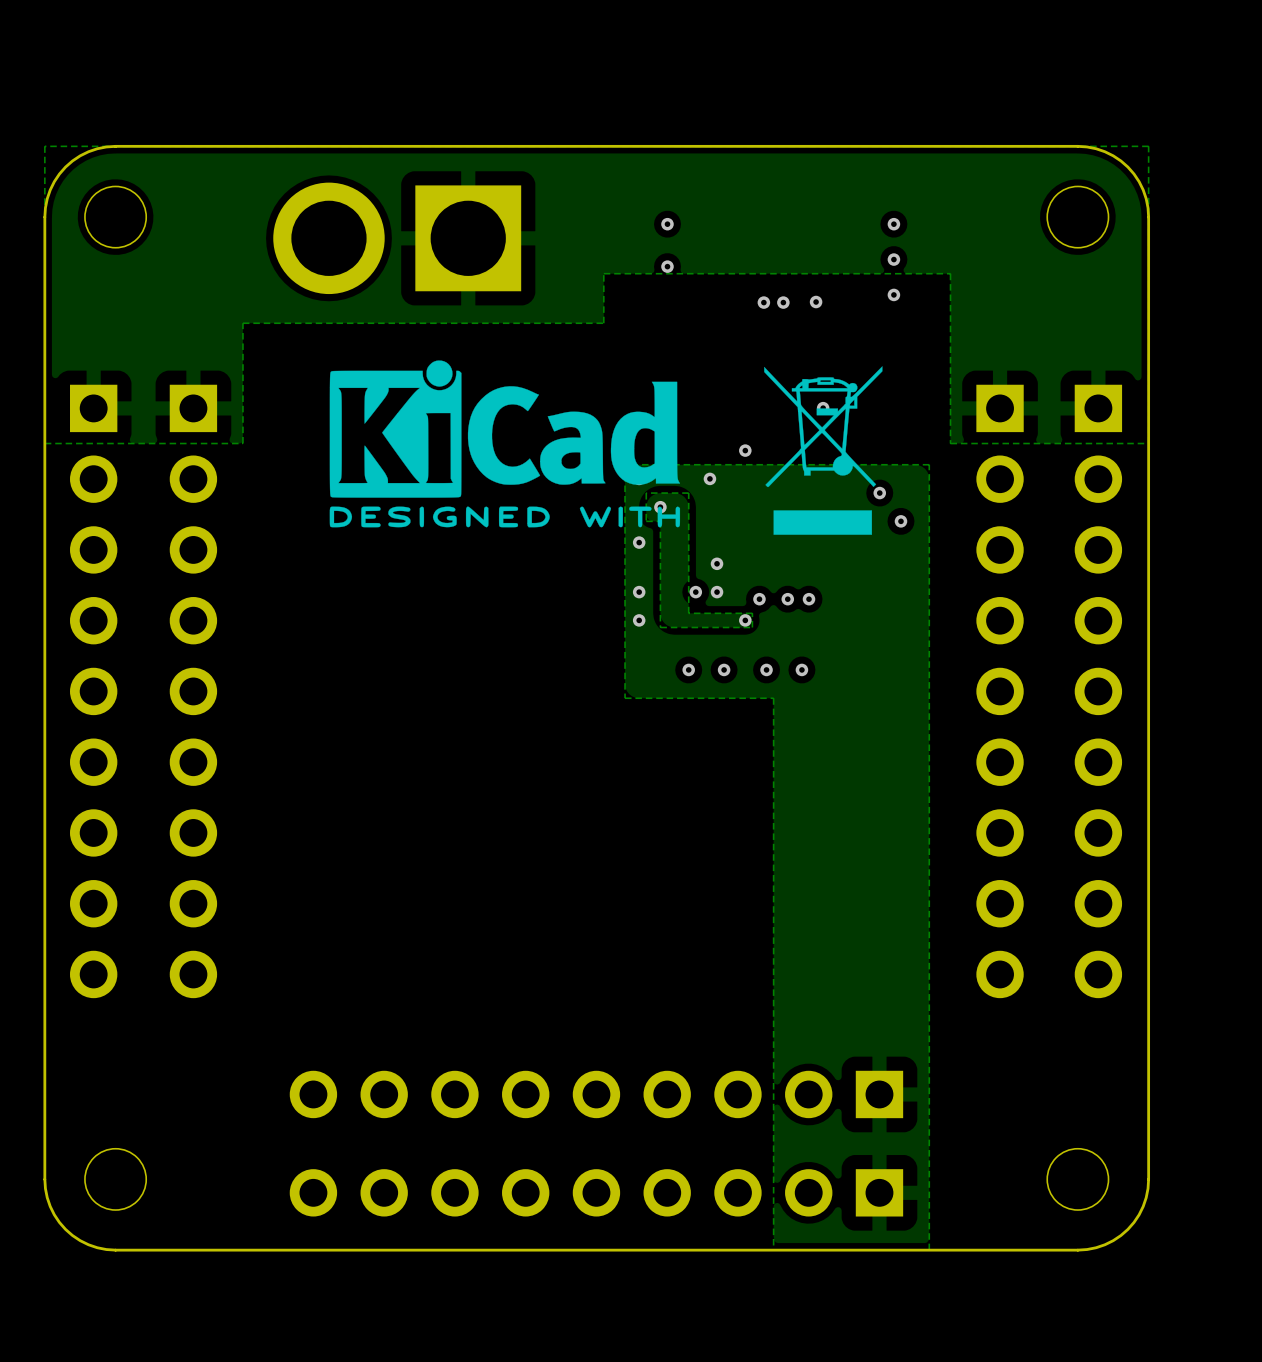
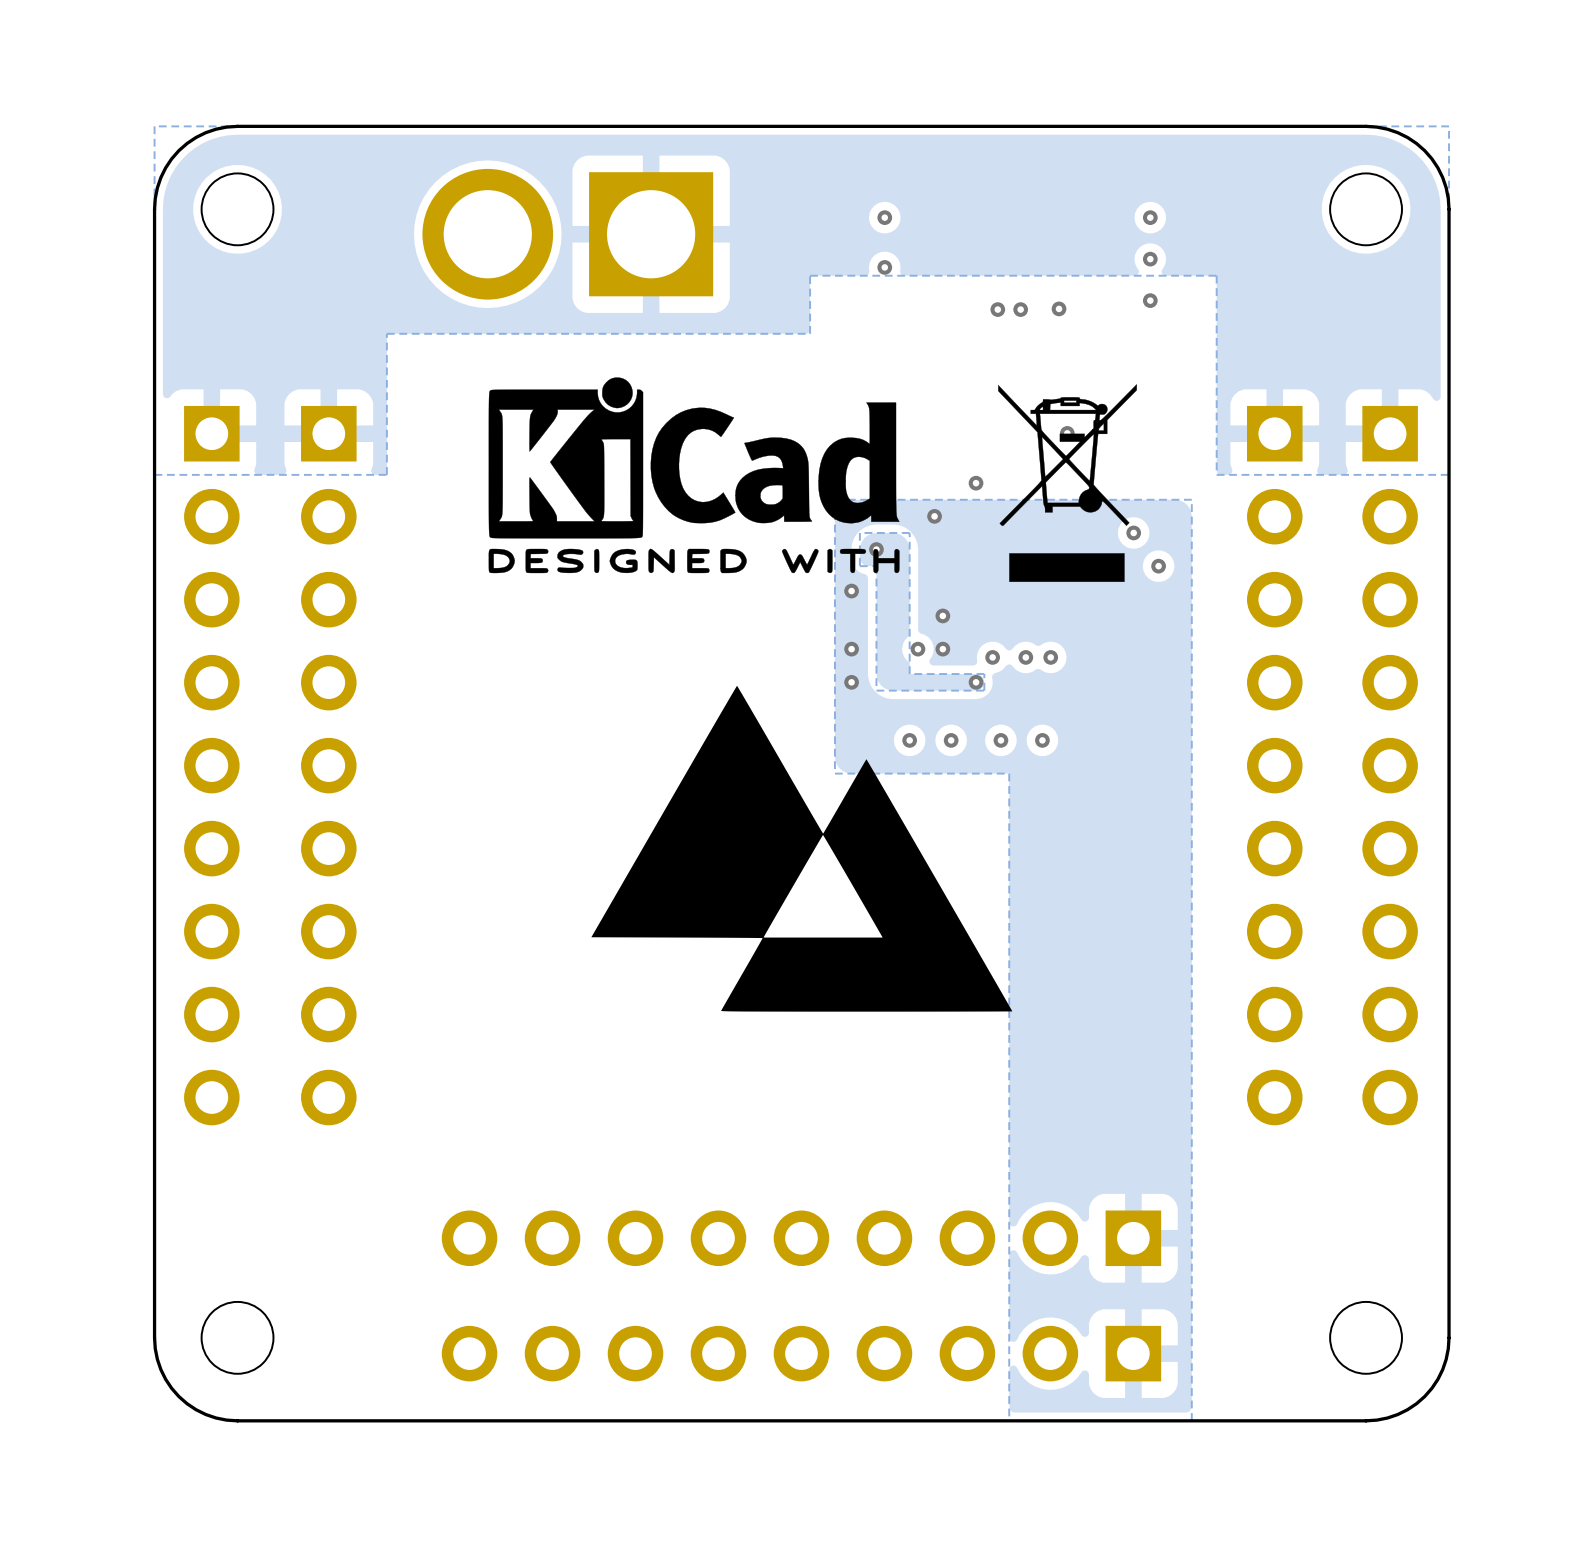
drawing: none -> [591, 685, 1013, 1012]

